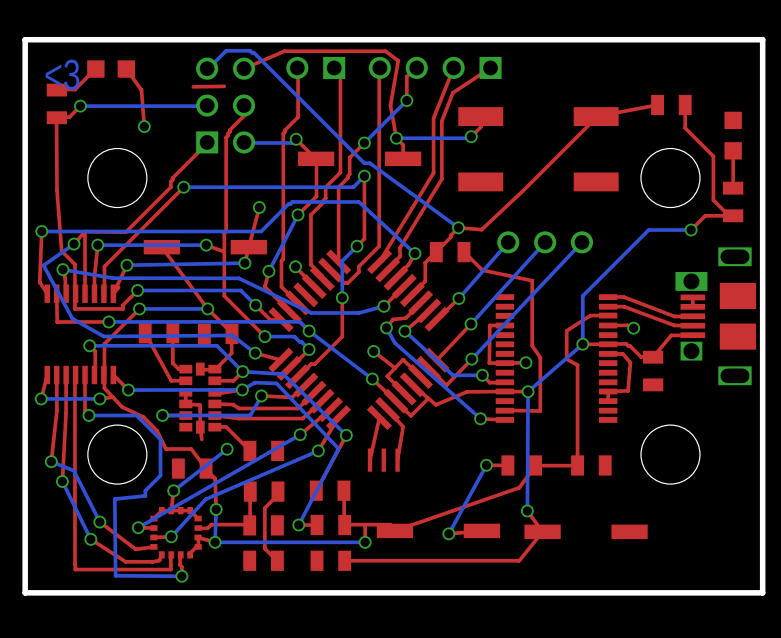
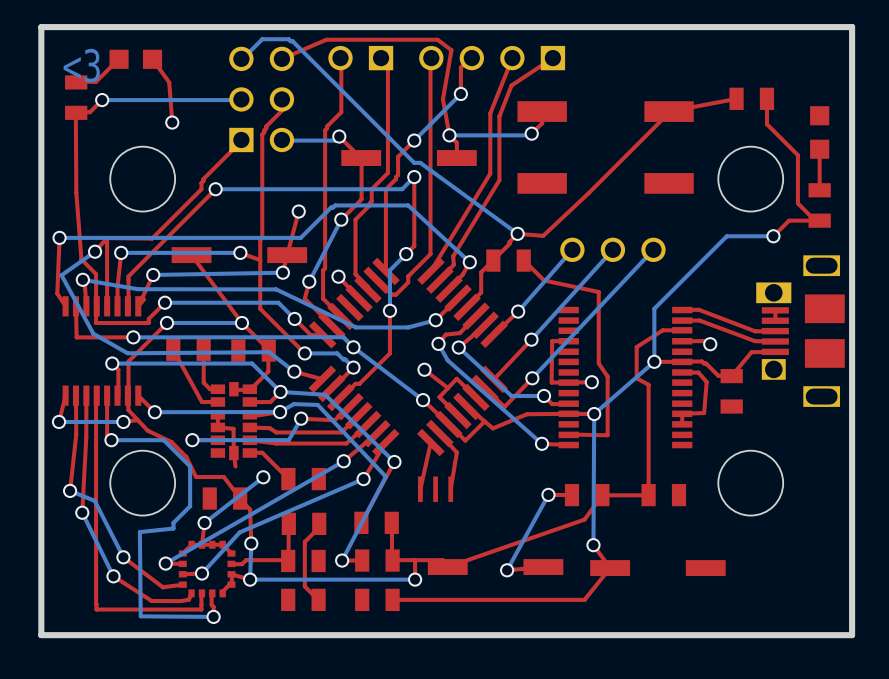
top track: (224, 86) (193, 86) -> none

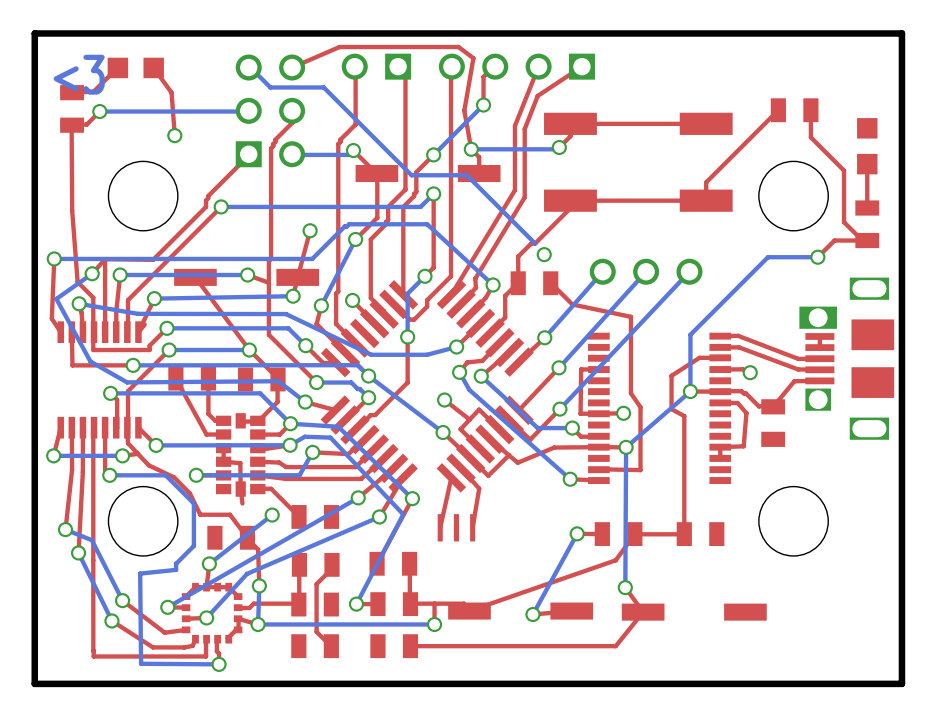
bottom track: (241, 58) (262, 39) (288, 39) (292, 41) (414, 162) (420, 162) (517, 233) -> (248, 67) (270, 87) (323, 87) (411, 175) (466, 175) (535, 243)
top track: (736, 98) (669, 111) -> (570, 123) (706, 123)
top track: (669, 112) (543, 235) (517, 233) (493, 260) -> (778, 110) (706, 182) (706, 200) (570, 200) (570, 208) (535, 243) (531, 243) (518, 256) (518, 282)

